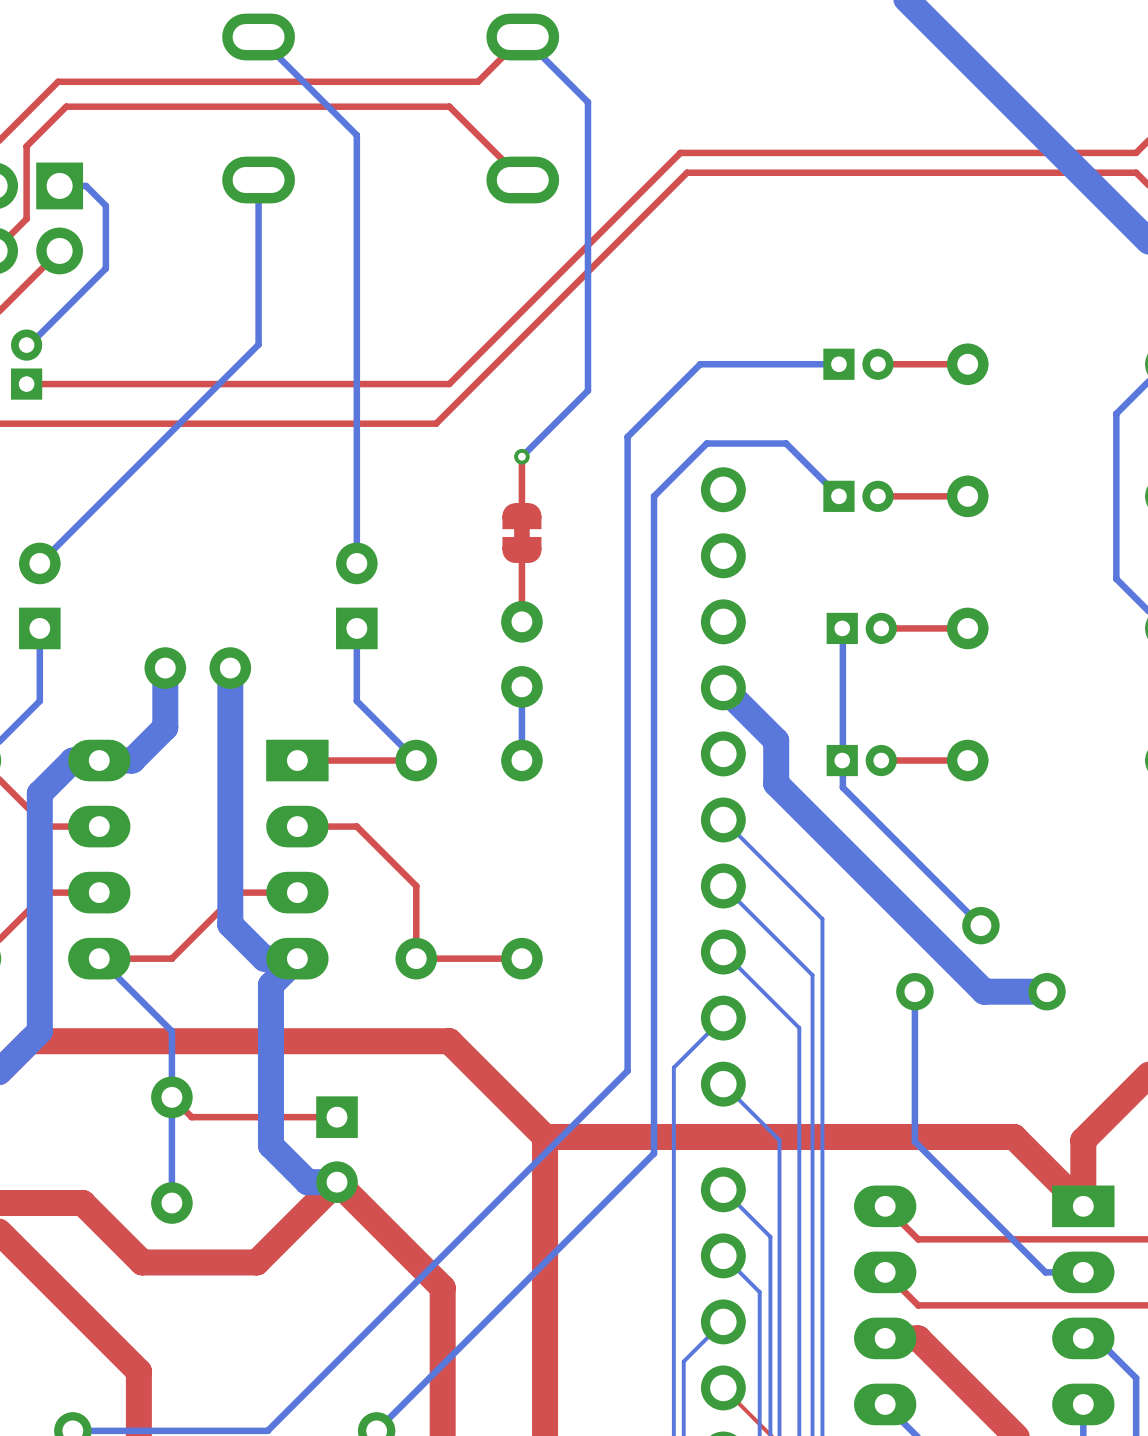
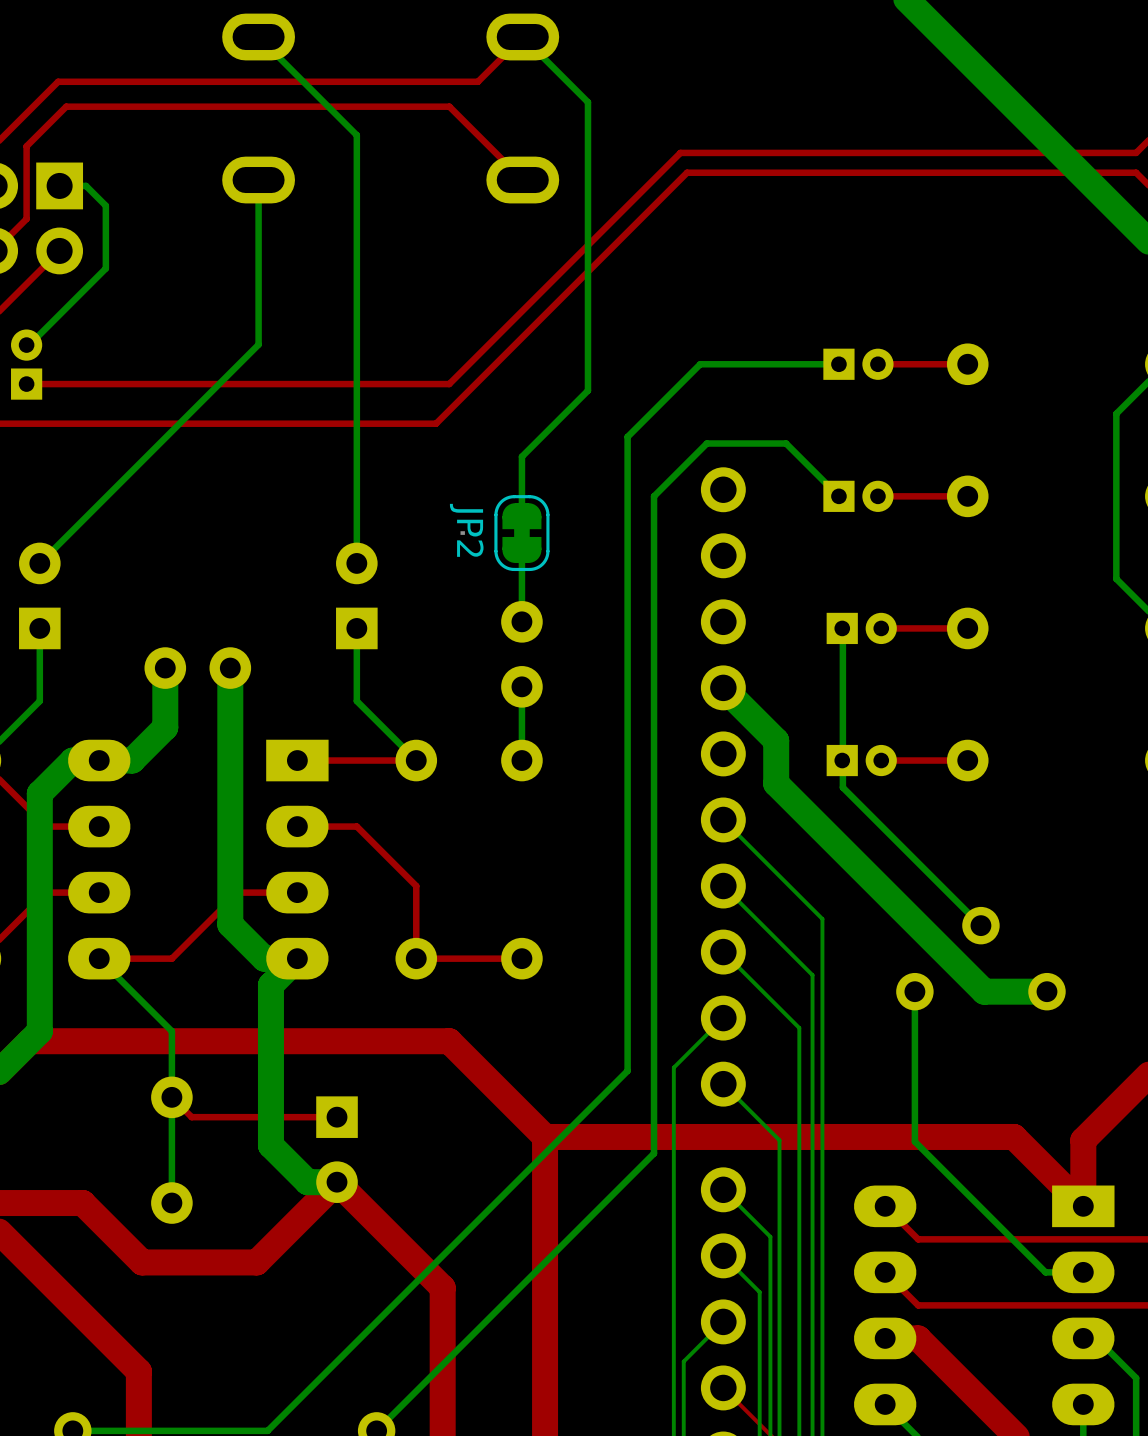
top track: (521, 456) (521, 516) -> none
bottom track: none -> (521, 456) (521, 516)
via: (521, 456) -> none
JP2 side: top (521, 533) -> bottom (521, 533)
top track: (521, 549) (521, 621) -> none
bottom track: none -> (521, 549) (521, 621)

